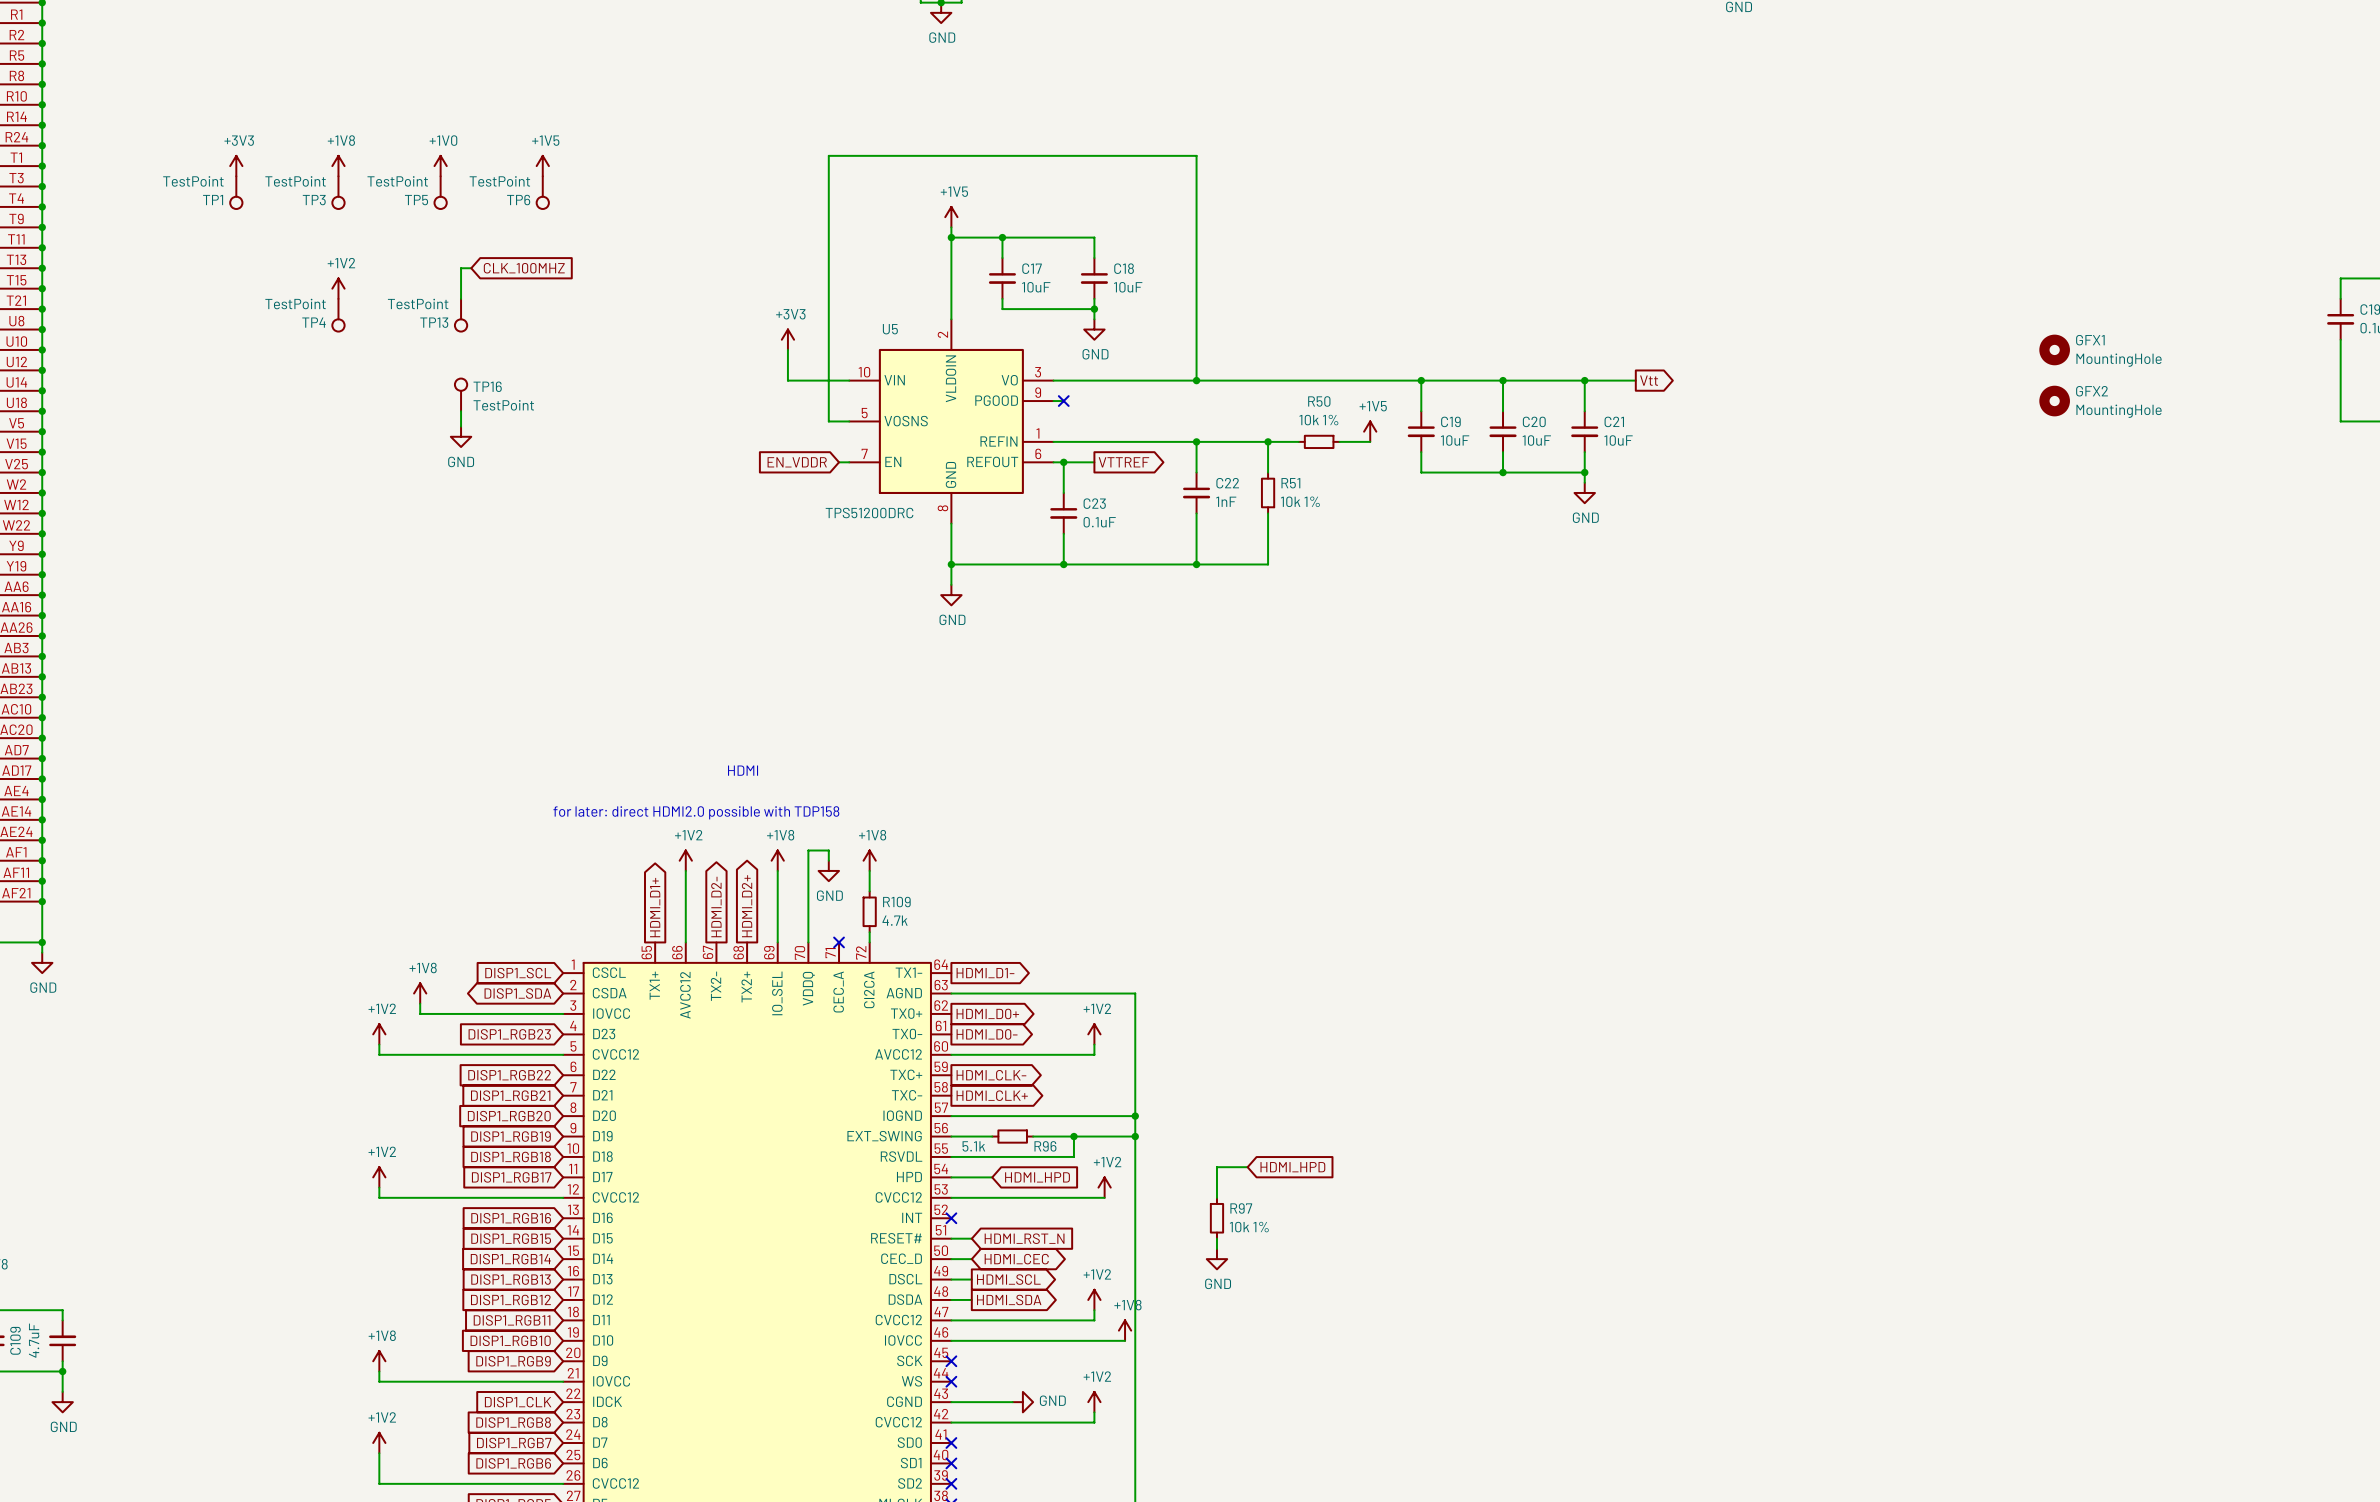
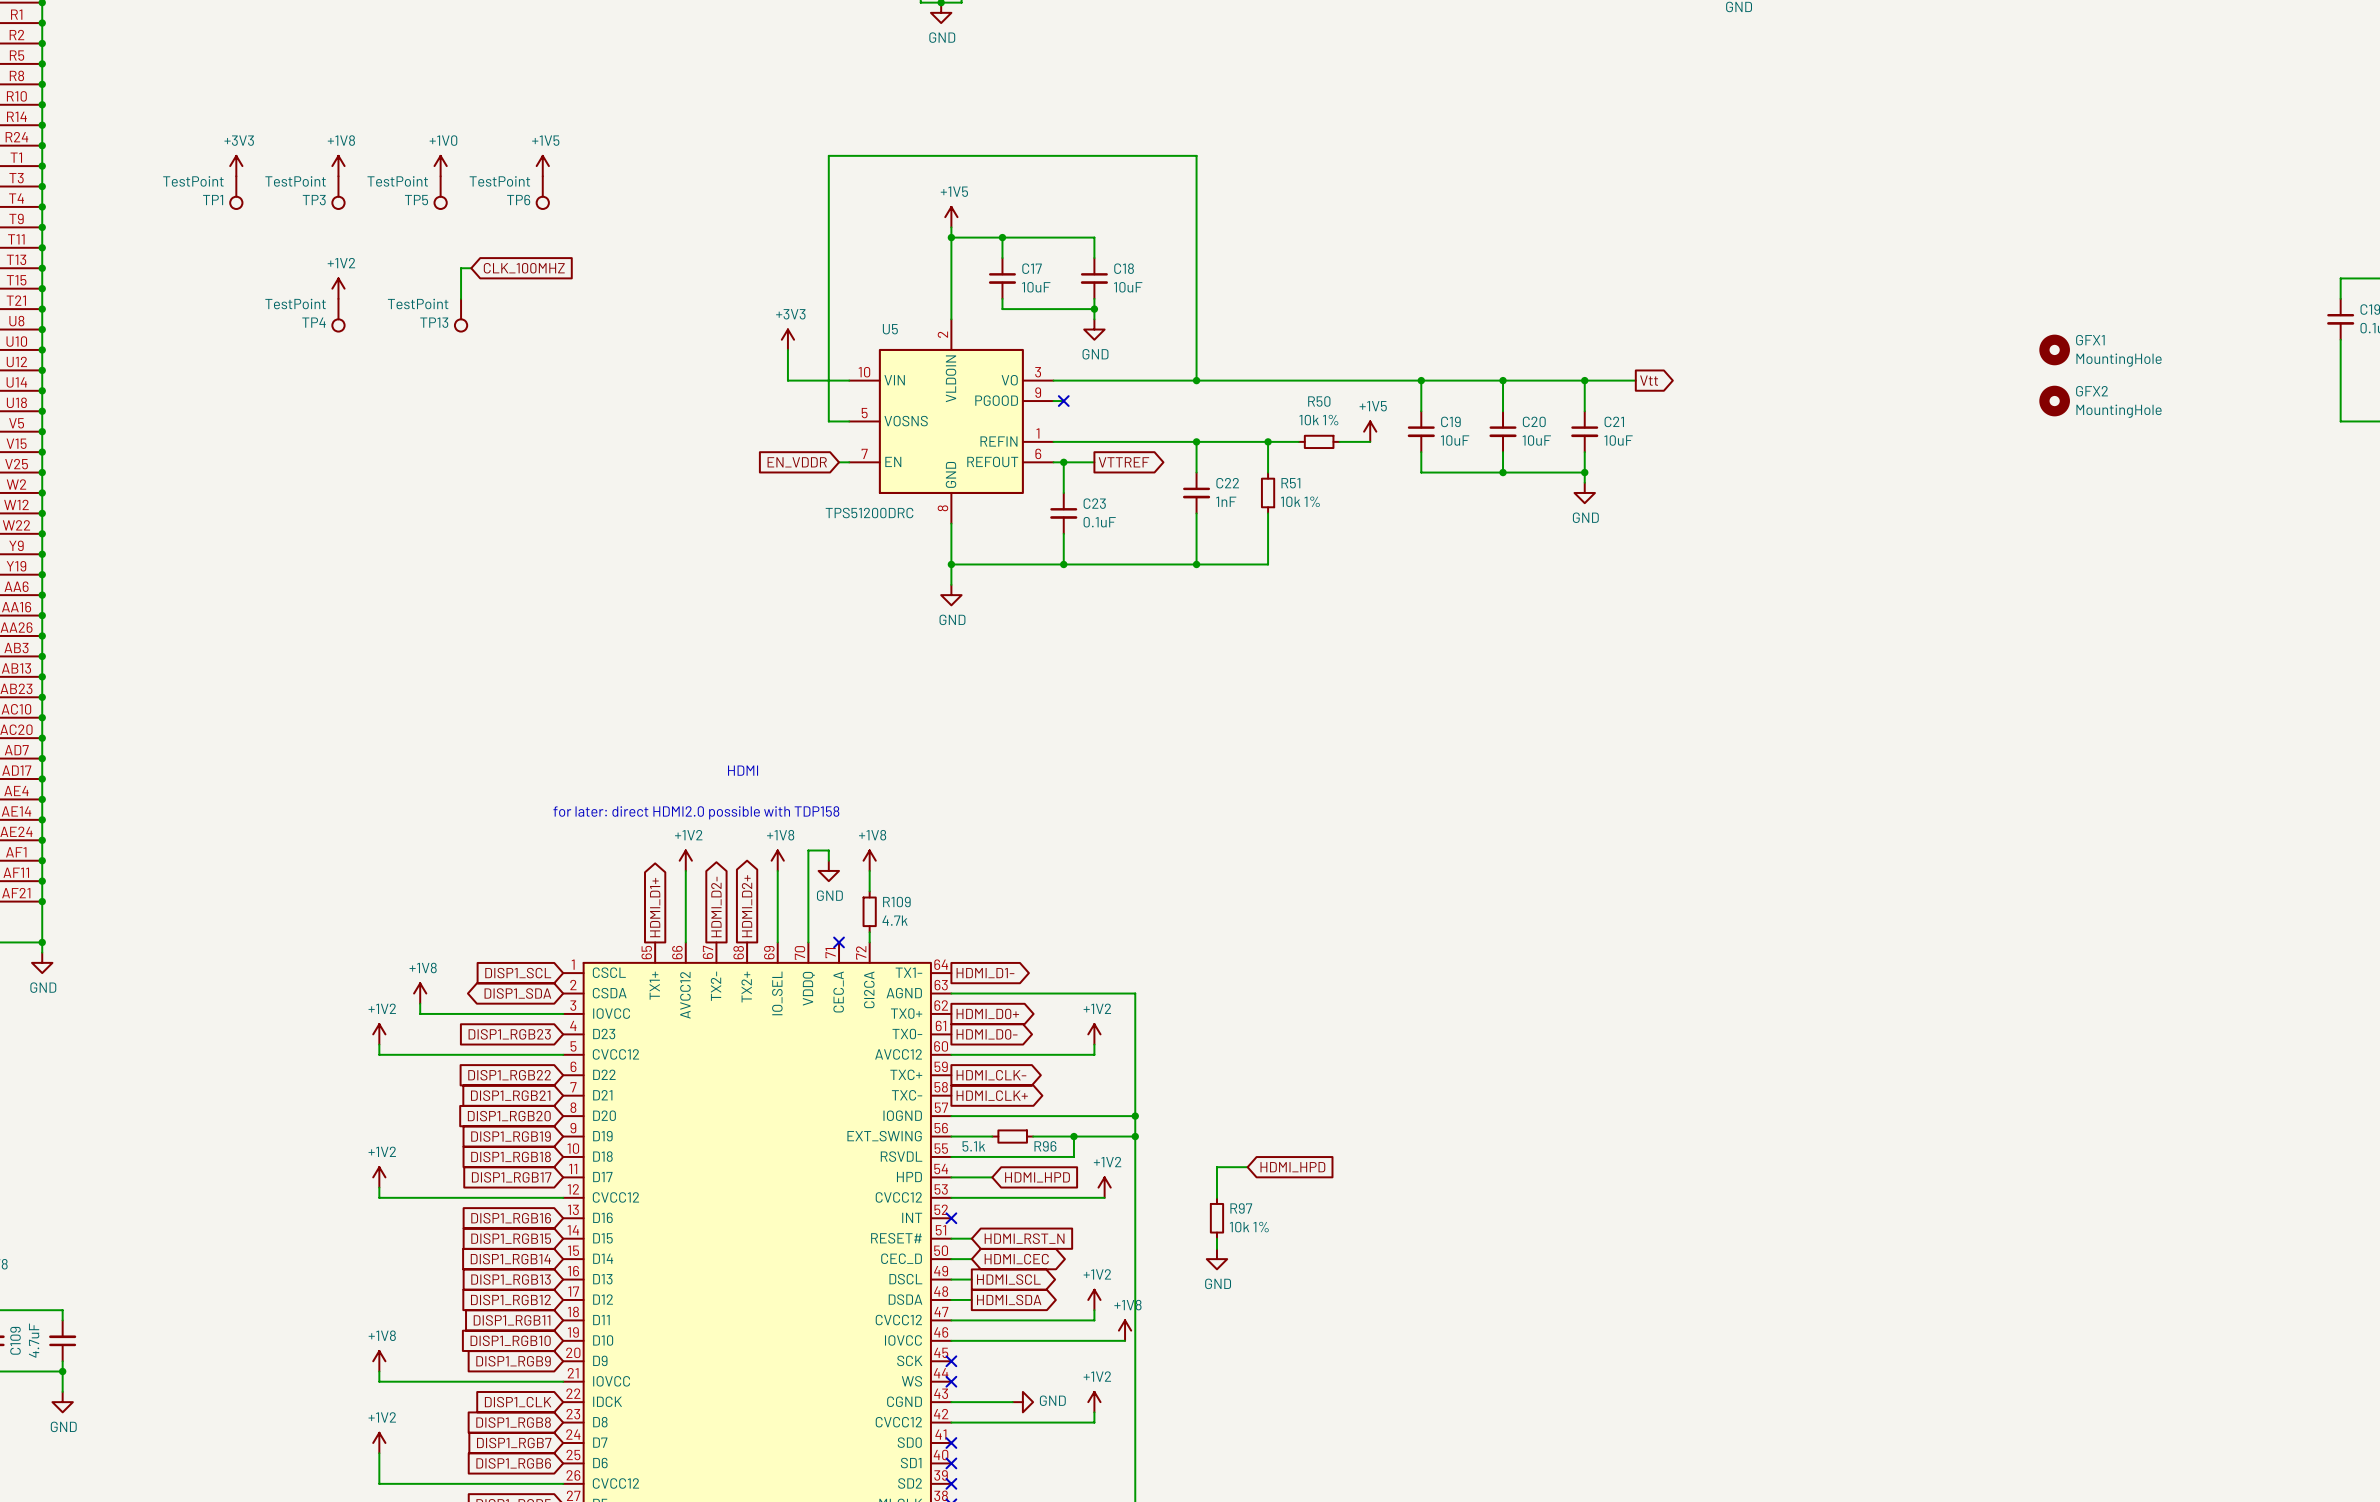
TP16: TestPoint (461, 394) -> none
wire: (461, 411) (461, 426) -> none
power symbol: GND (461, 436) -> none

